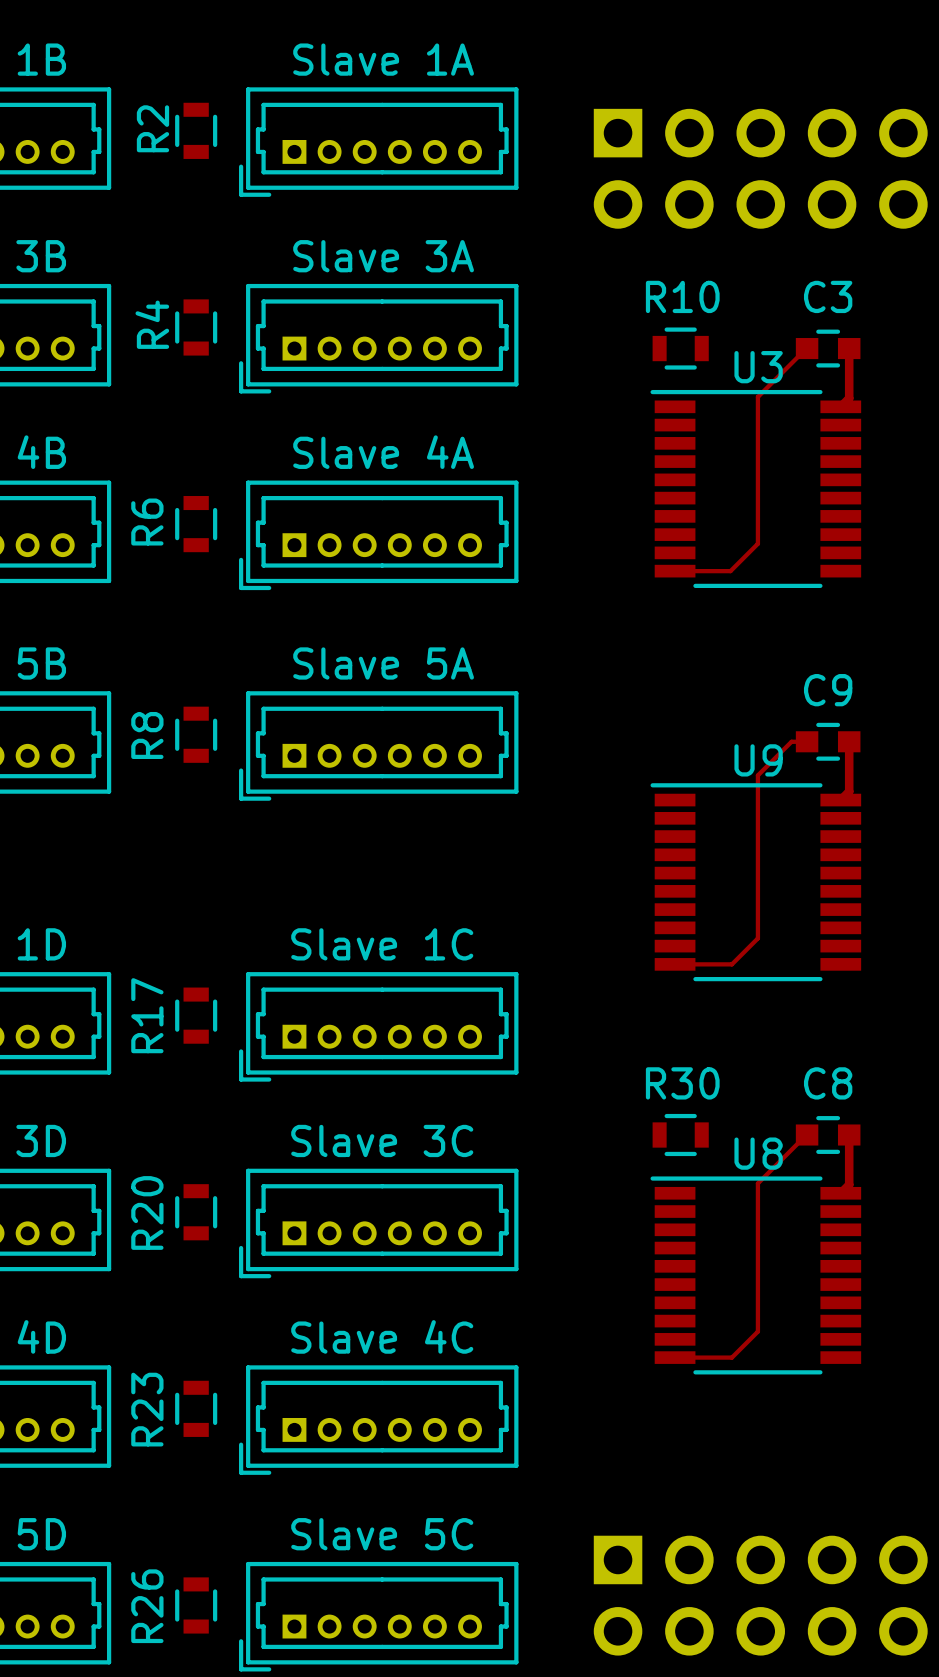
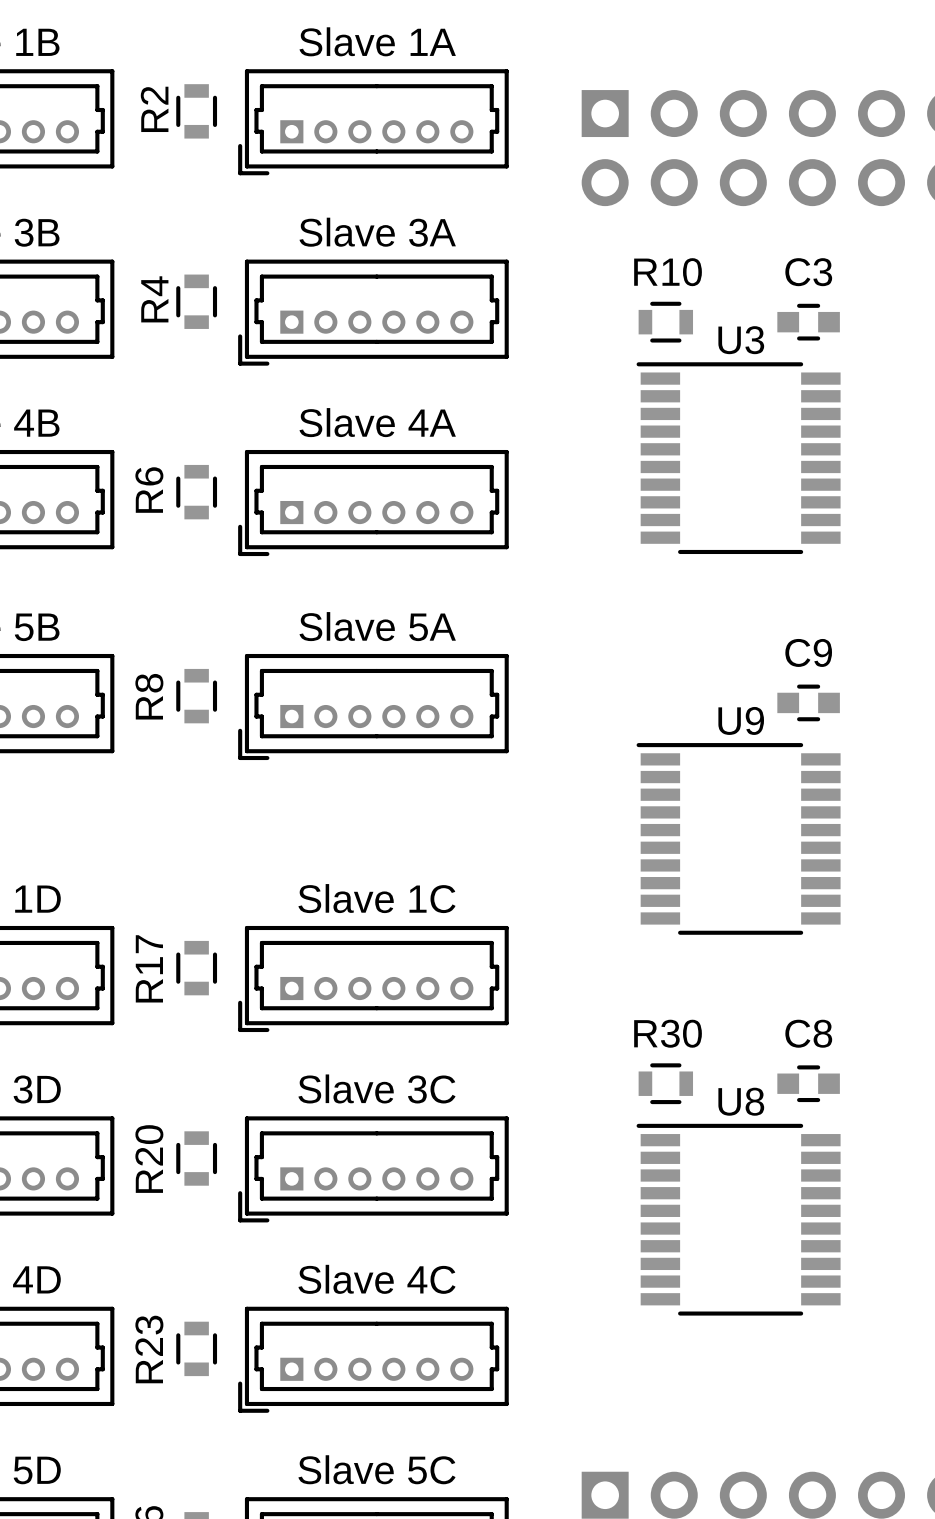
track: (807, 348) (757, 396) (757, 543) (730, 571) (675, 571) -> none
track: (849, 348) (849, 398) (840, 406) -> none
track: (807, 741) (791, 741) (757, 775) (757, 938) (731, 964) (675, 964) -> none
track: (849, 741) (849, 791) (840, 800) -> none
track: (807, 1135) (757, 1183) (757, 1331) (731, 1357) (675, 1357) -> none
track: (849, 1135) (849, 1184) (840, 1193) -> none

